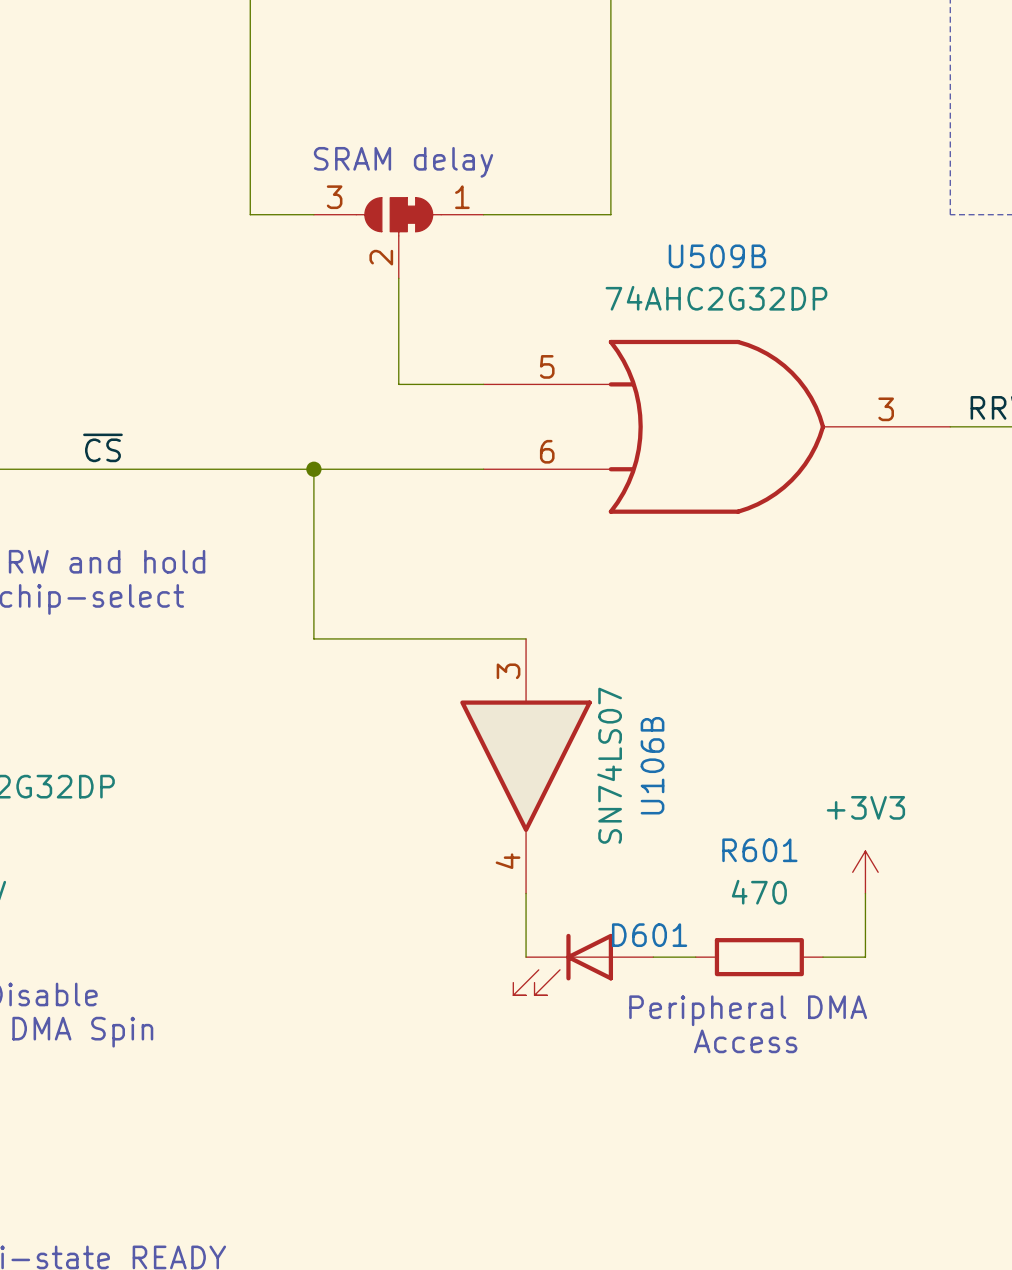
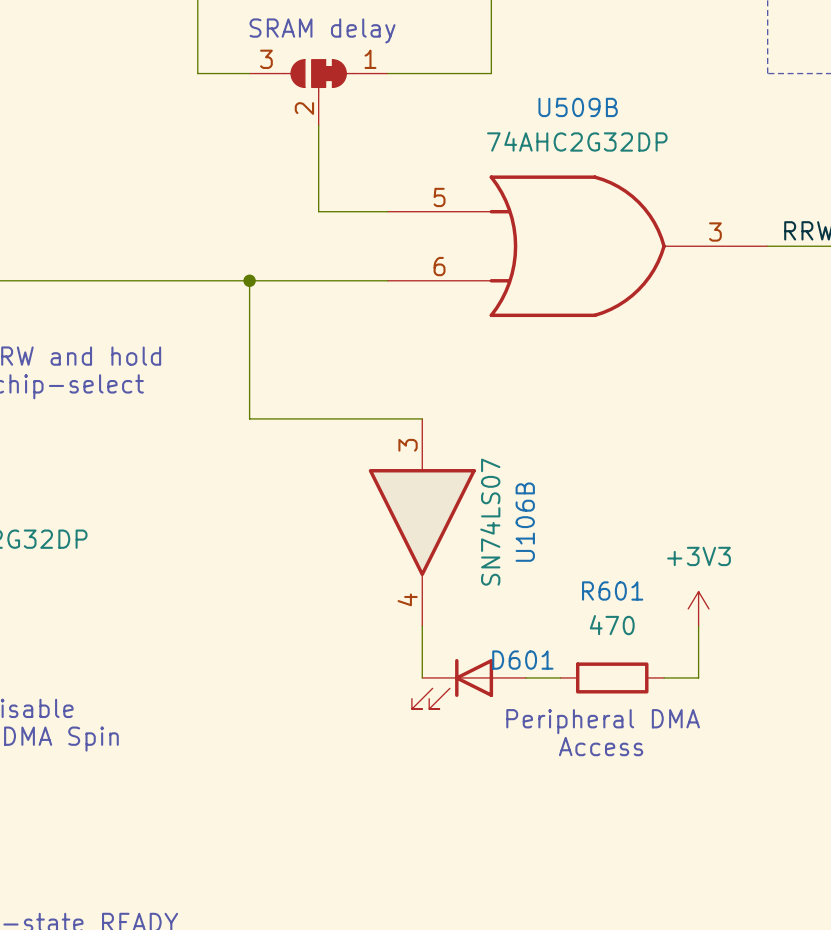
label: ~{CS} (102, 447) -> none

